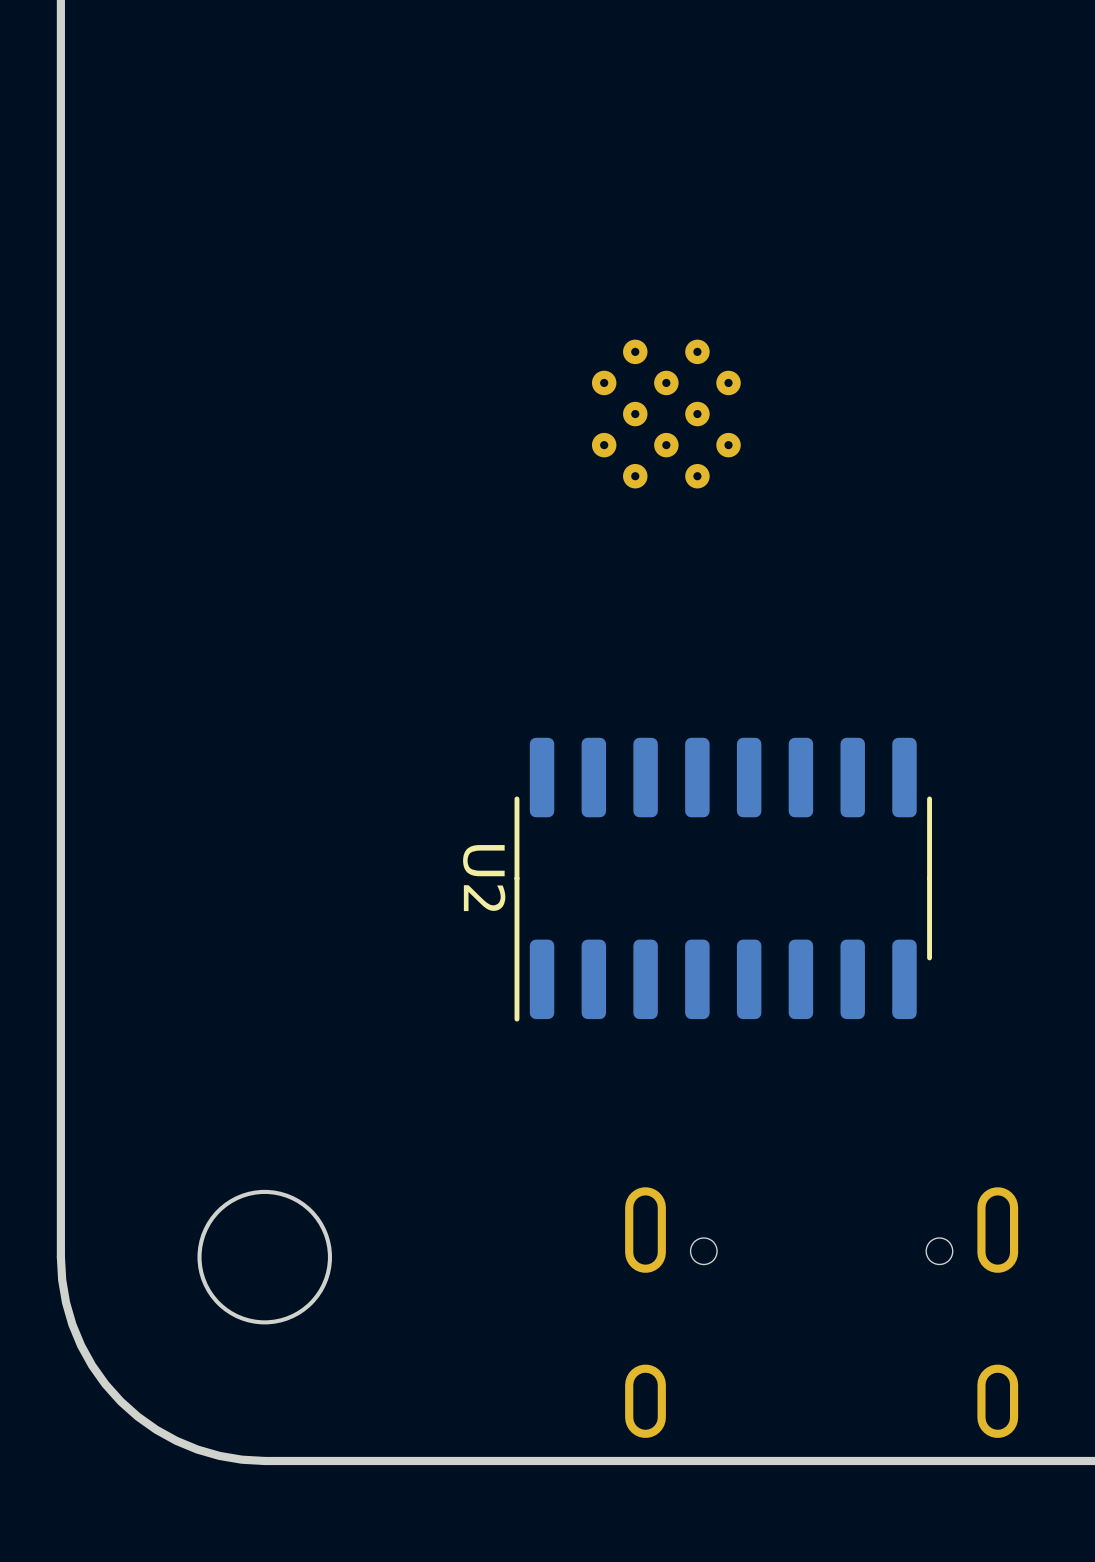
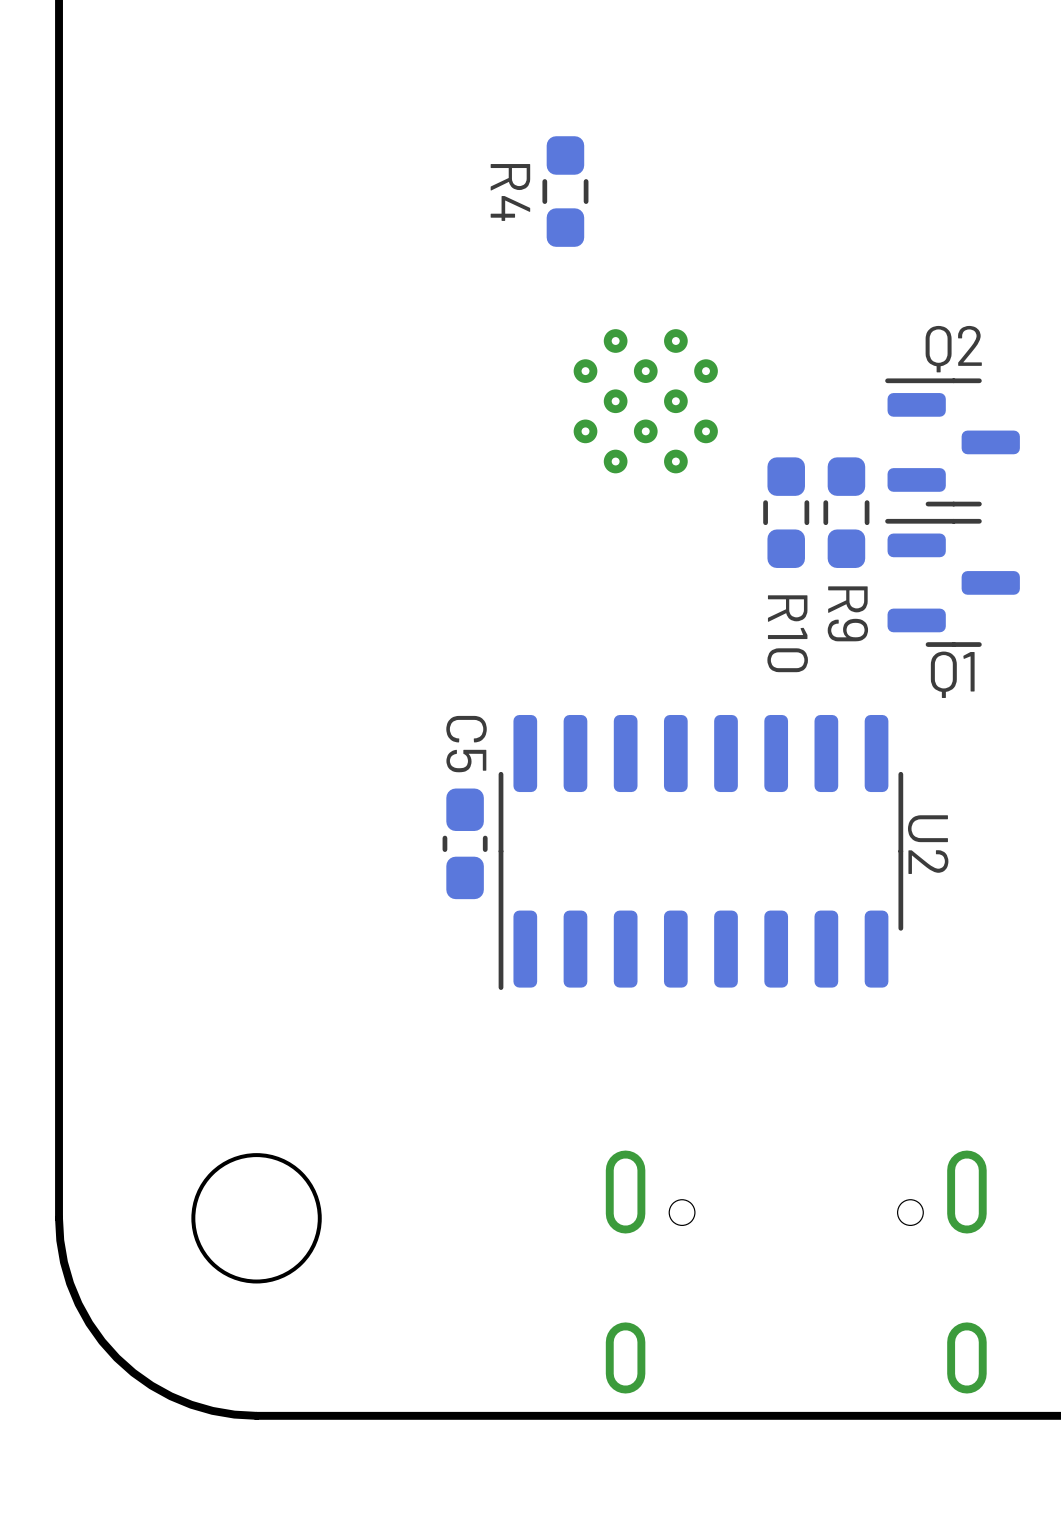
R4: none -> (565, 191)
Q2: none -> (952, 442)
R10: none -> (786, 512)
R9: none -> (846, 512)
Q1: none -> (952, 582)
C5: none -> (465, 843)
U2 name position: U2 (484, 878) -> U2 (928, 844)

